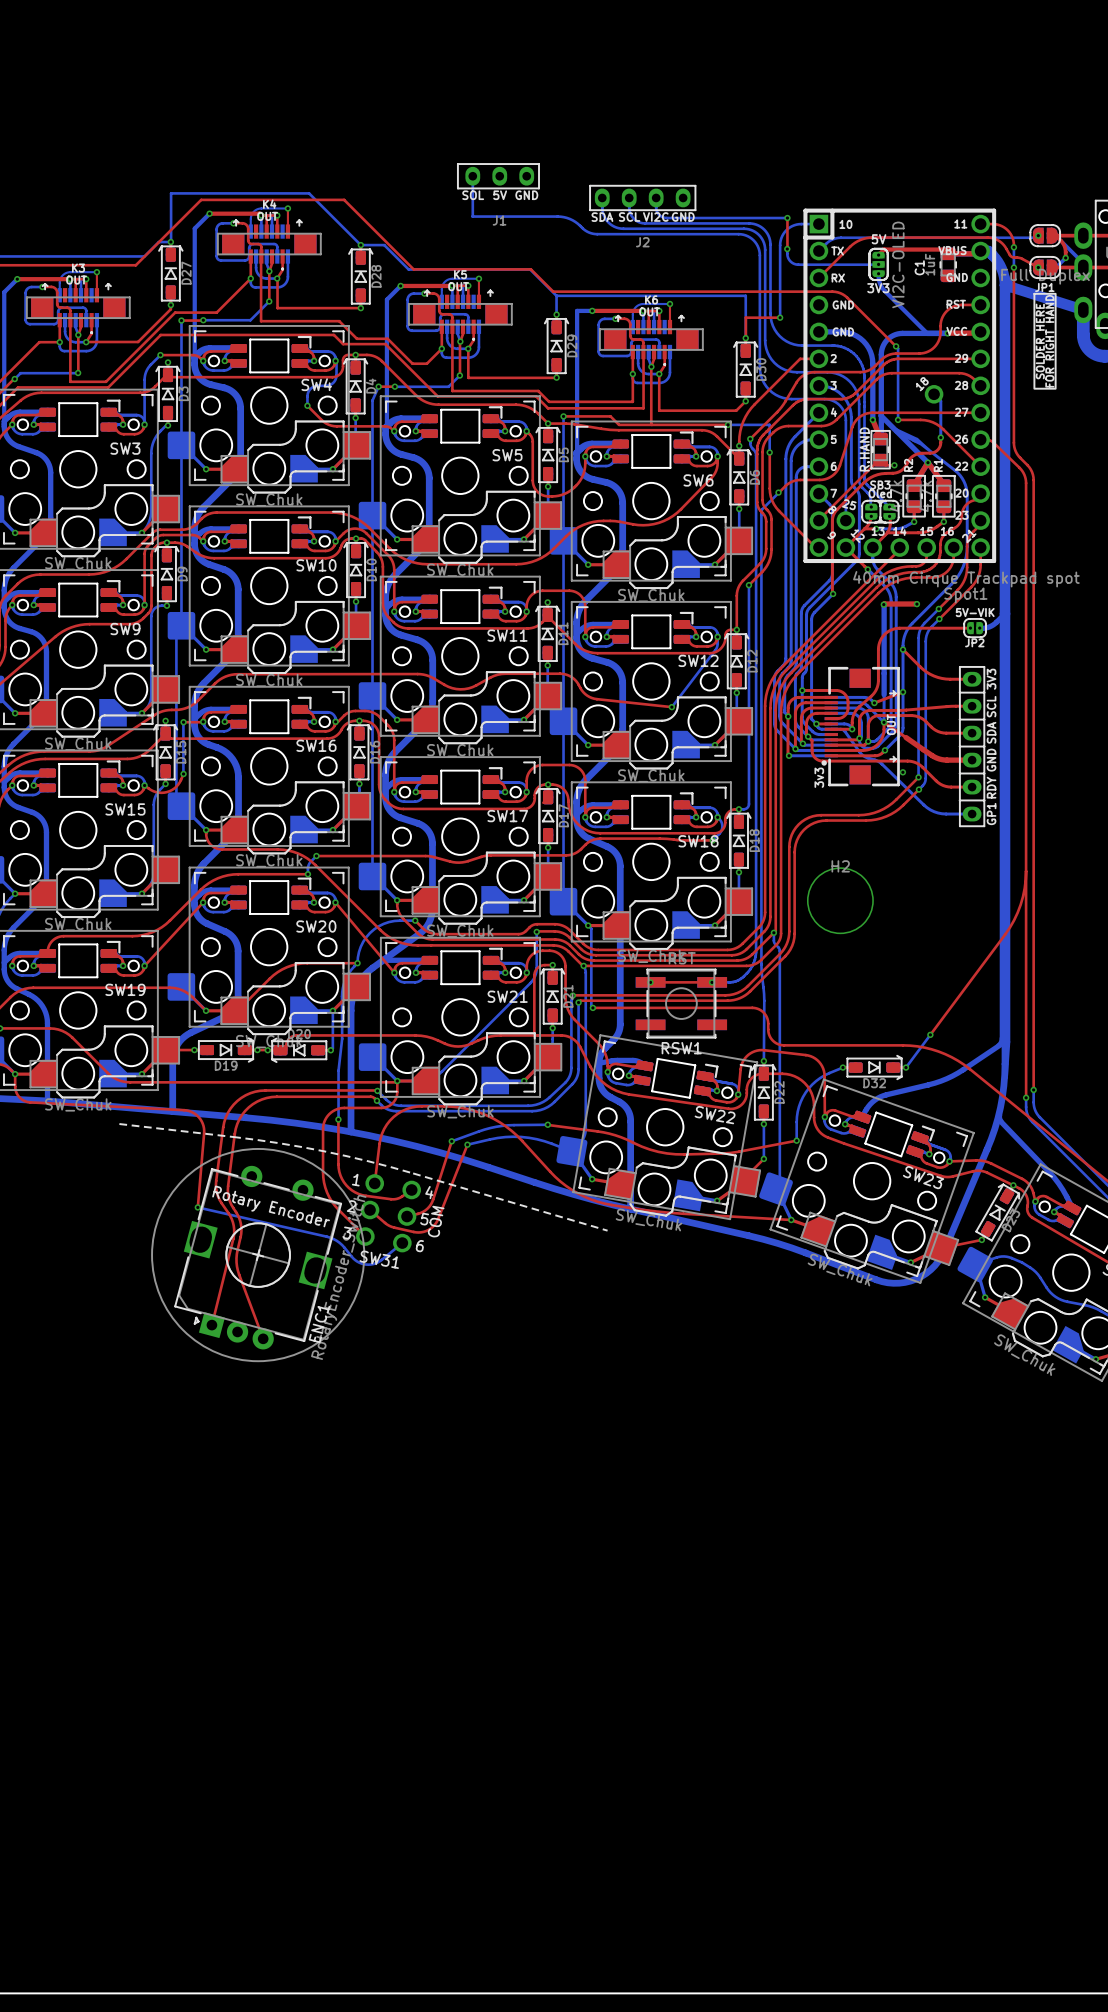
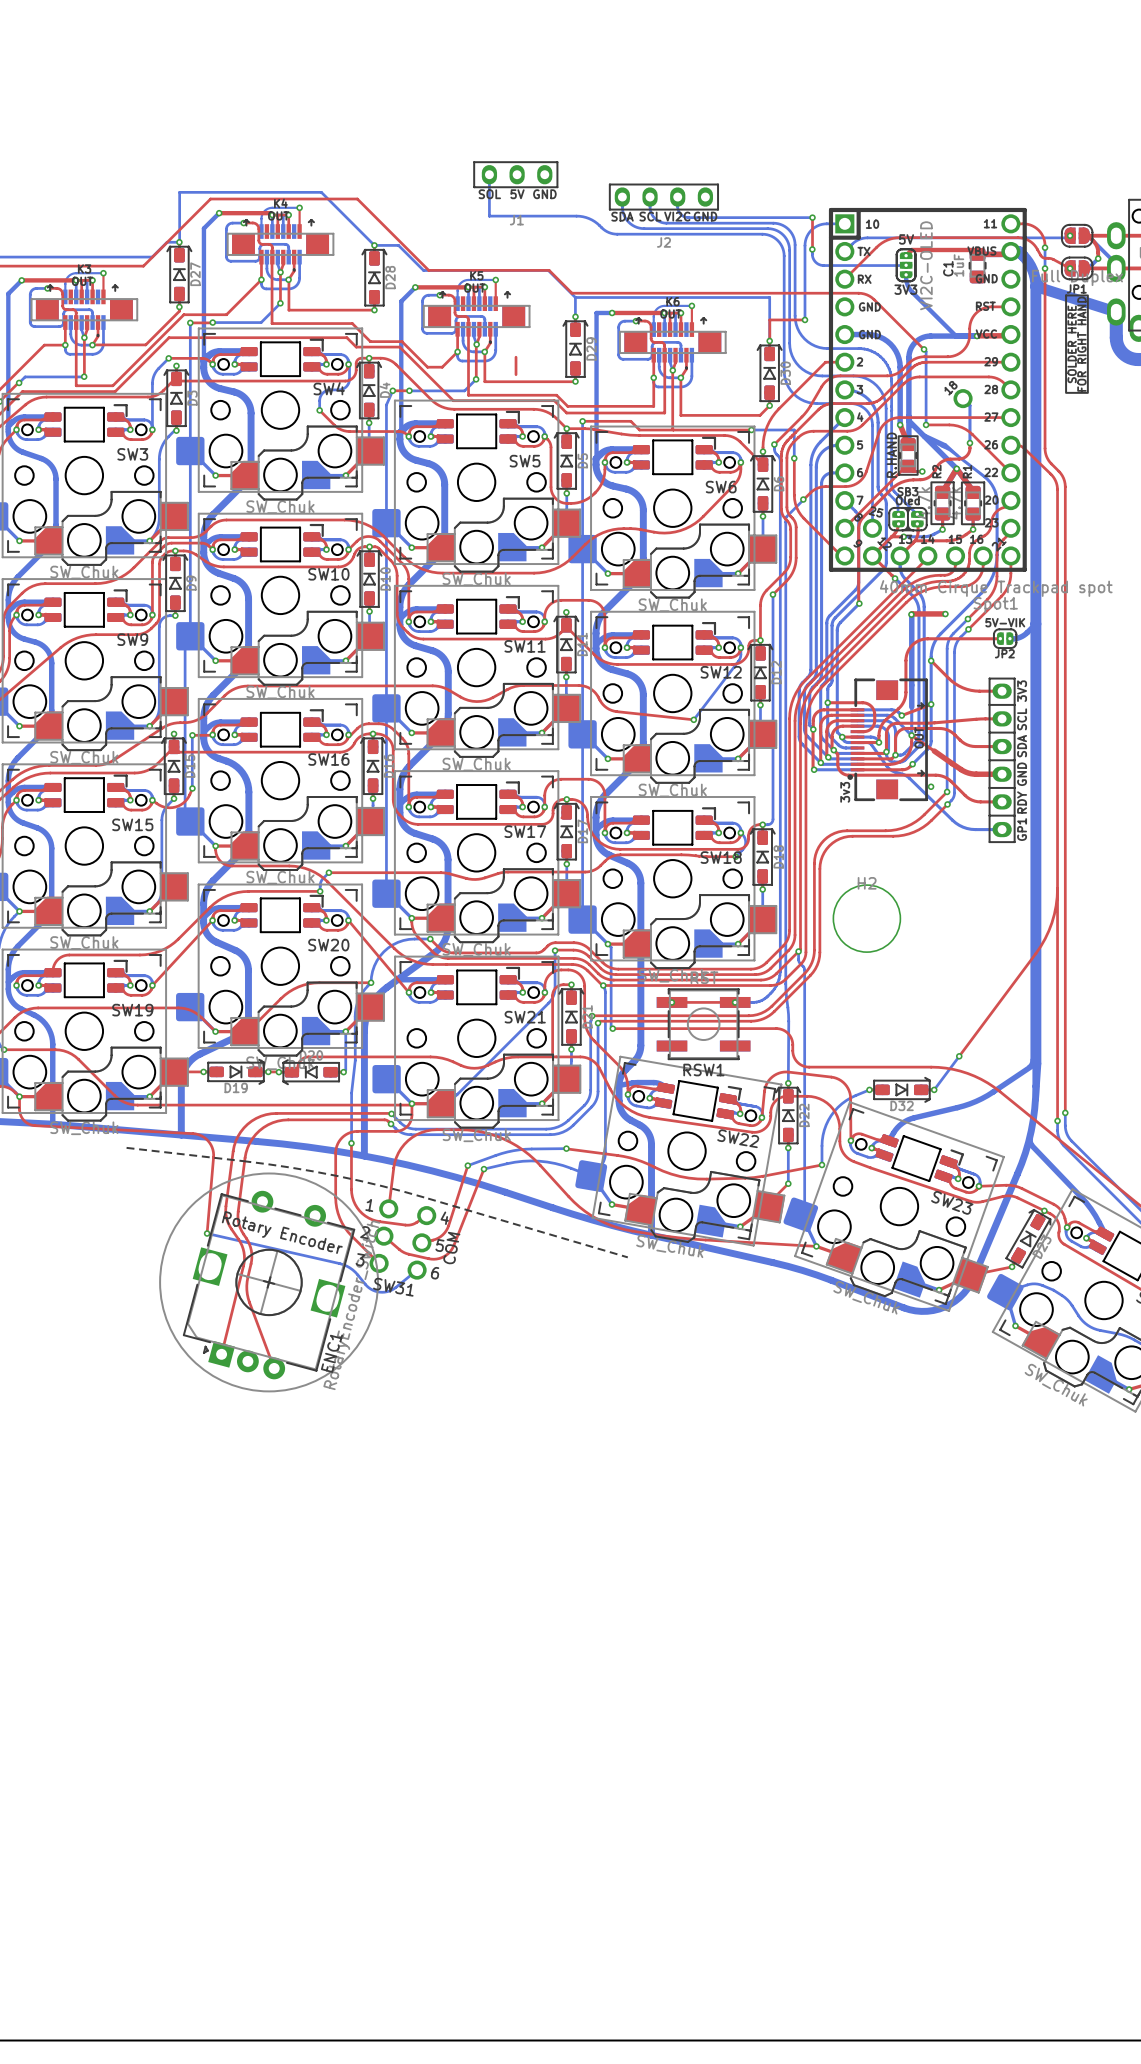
top track: none -> (516, 357) (516, 374)

